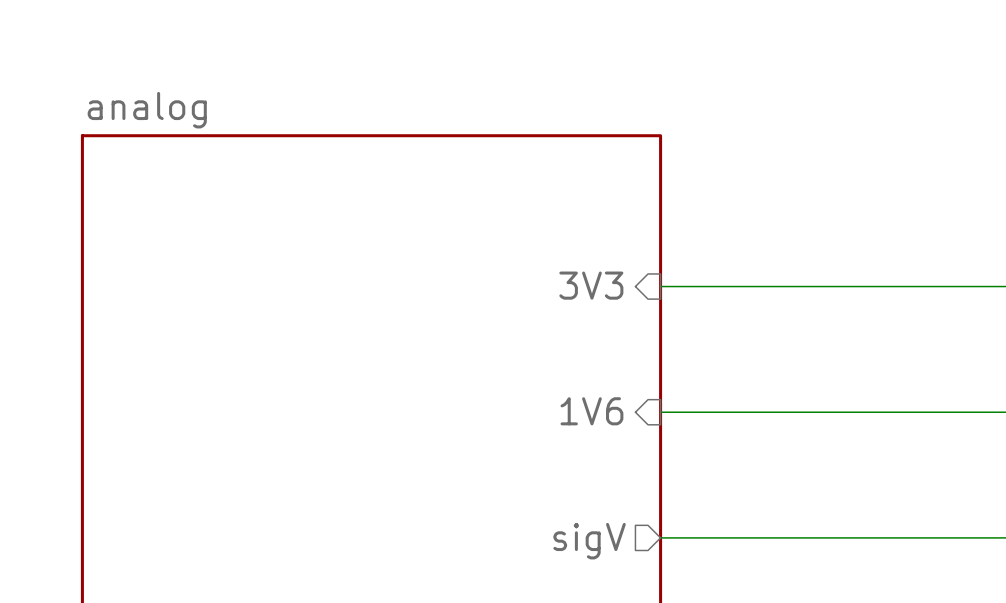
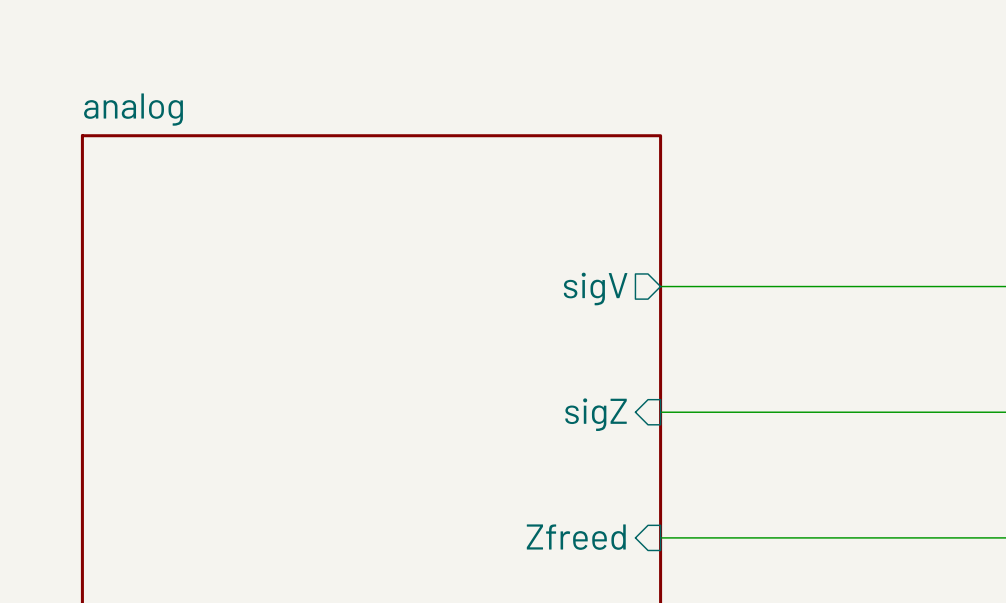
sheet pin shape: input (591, 285) -> output (595, 289)
sheet pin: 3V3 (591, 285) -> sigV (595, 289)
sheet pin: 1V6 (591, 411) -> sigZ (596, 414)
sheet pin shape: output (589, 541) -> input (576, 537)
sheet pin: sigV (589, 541) -> Zfreed (576, 537)

